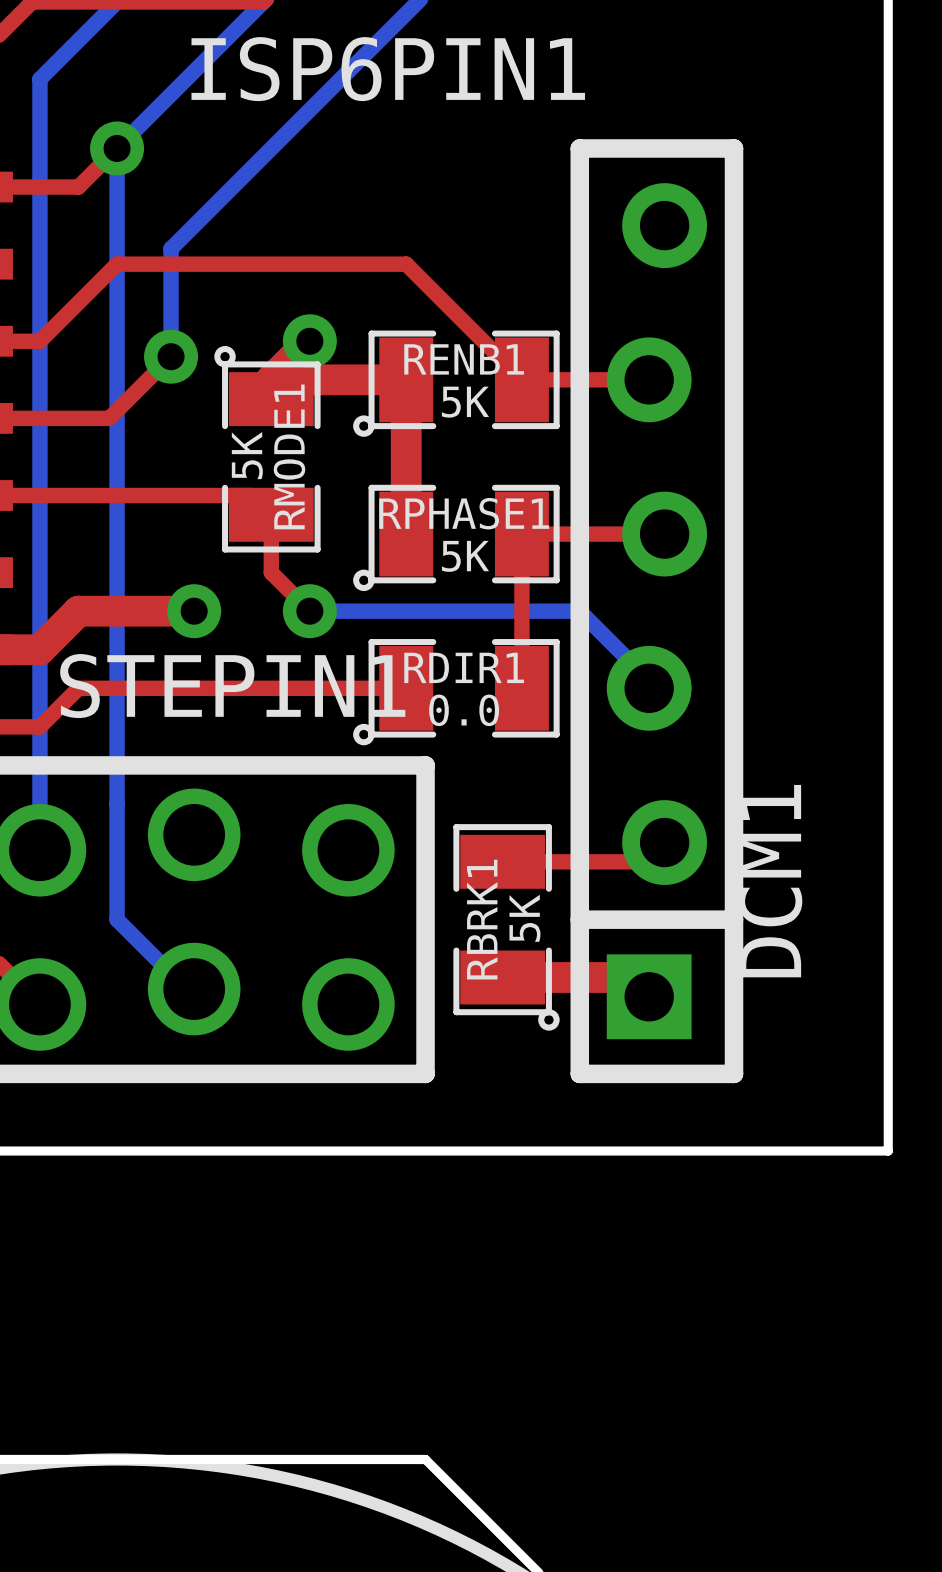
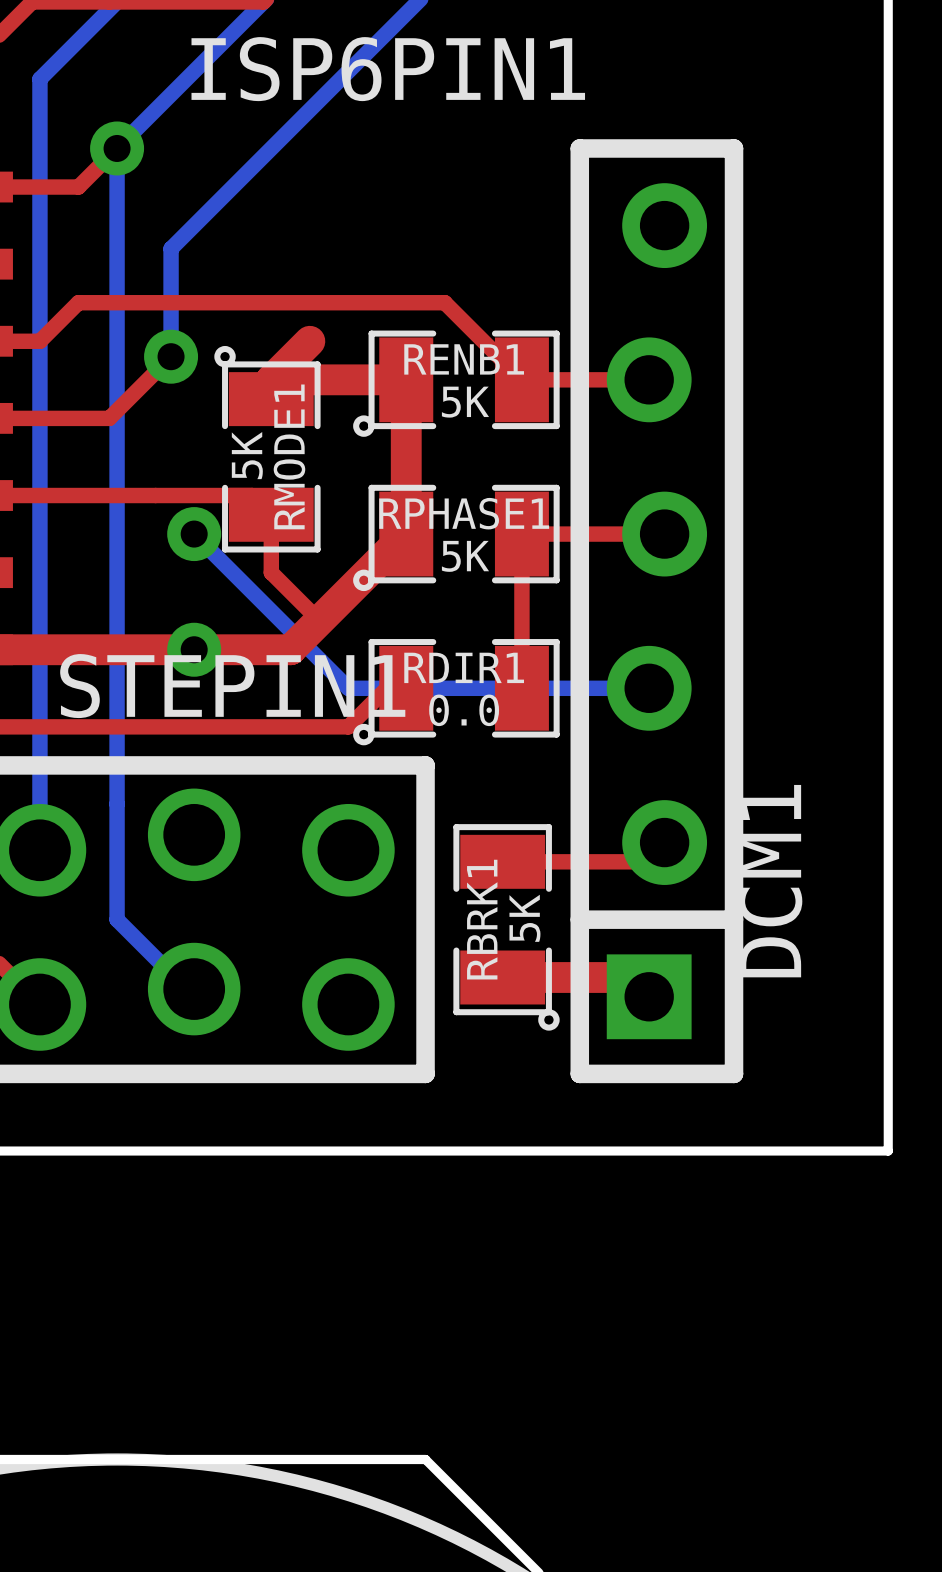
top track: (78, 302) (117, 264) (406, 264) (444, 302) -> (78, 302) (444, 302)
via: (309, 341) -> none
bottom track: none -> (194, 534) (348, 688) (656, 688)
via: none -> (194, 534)
top track: (194, 611) (78, 611) (39, 649) -> (406, 534) (290, 649) (39, 649)
via position: (194, 611) -> (194, 649)
bottom track: (309, 611) (579, 611) (649, 680) (649, 688) -> none
via: (309, 611) -> none
top track: (386, 688) (78, 688) (39, 726) -> (386, 688) (348, 726) (39, 726)

